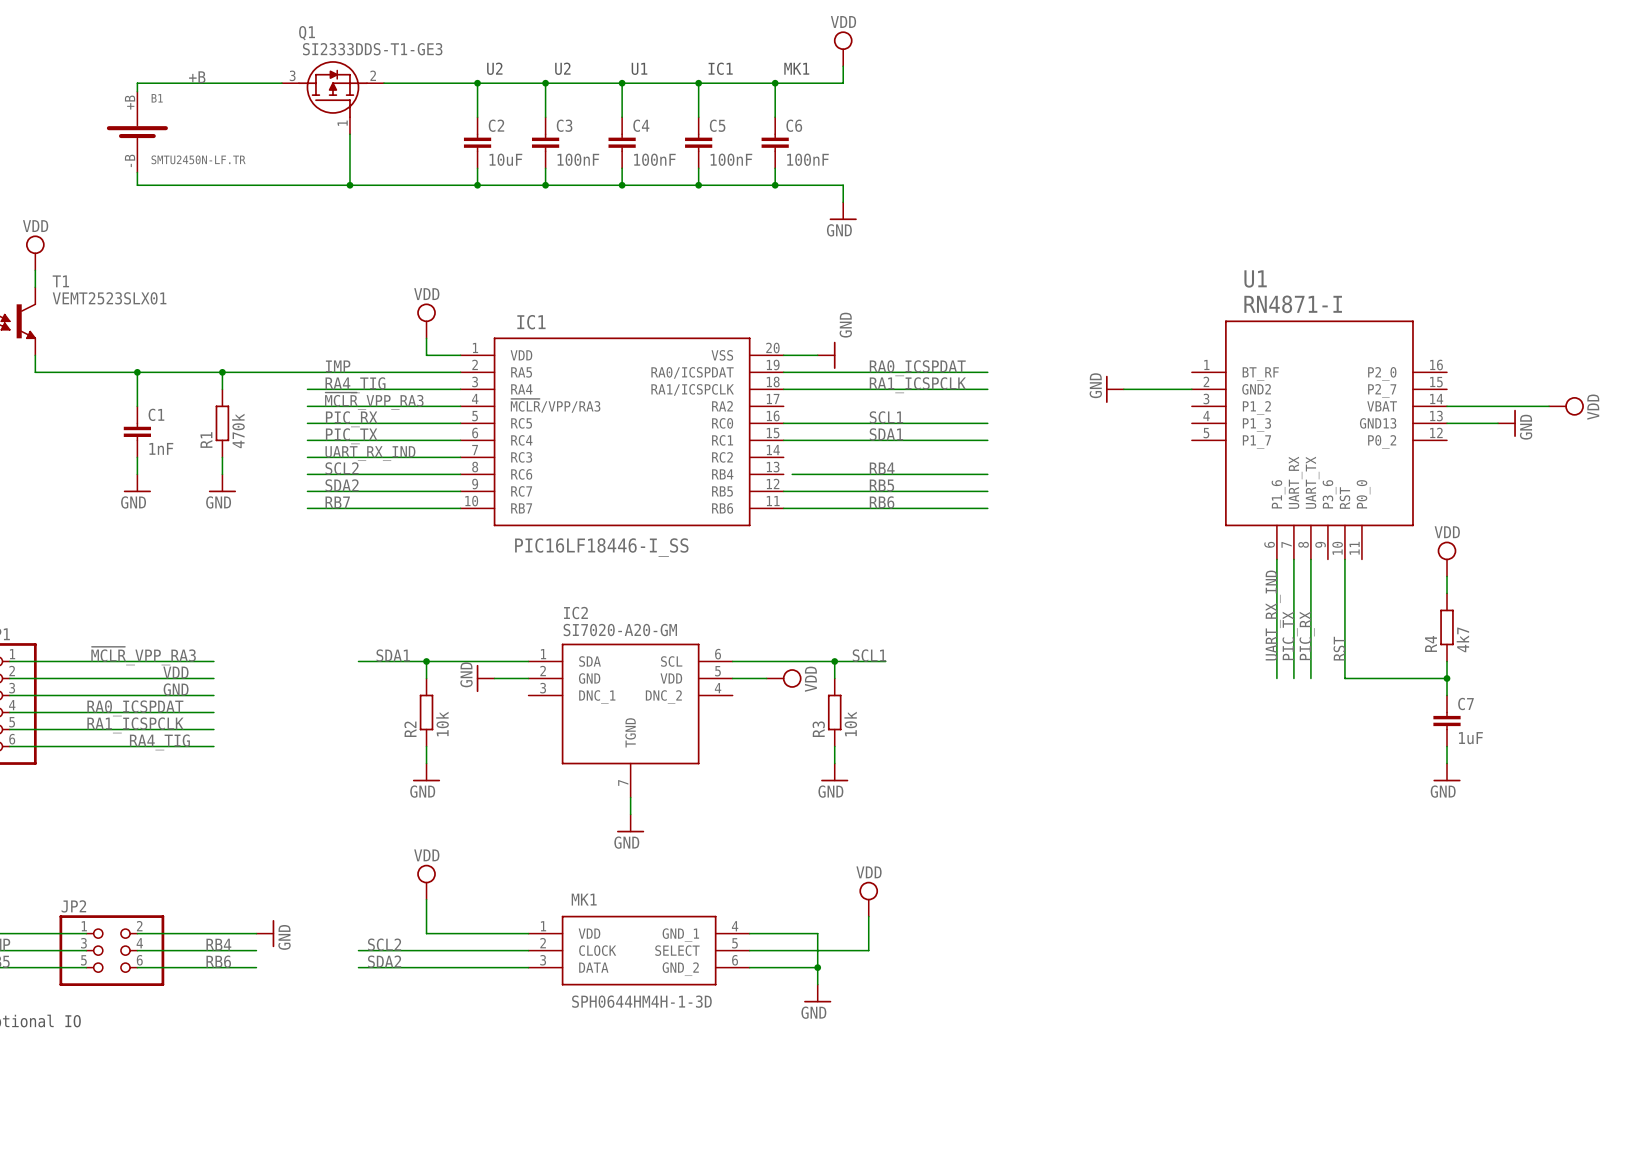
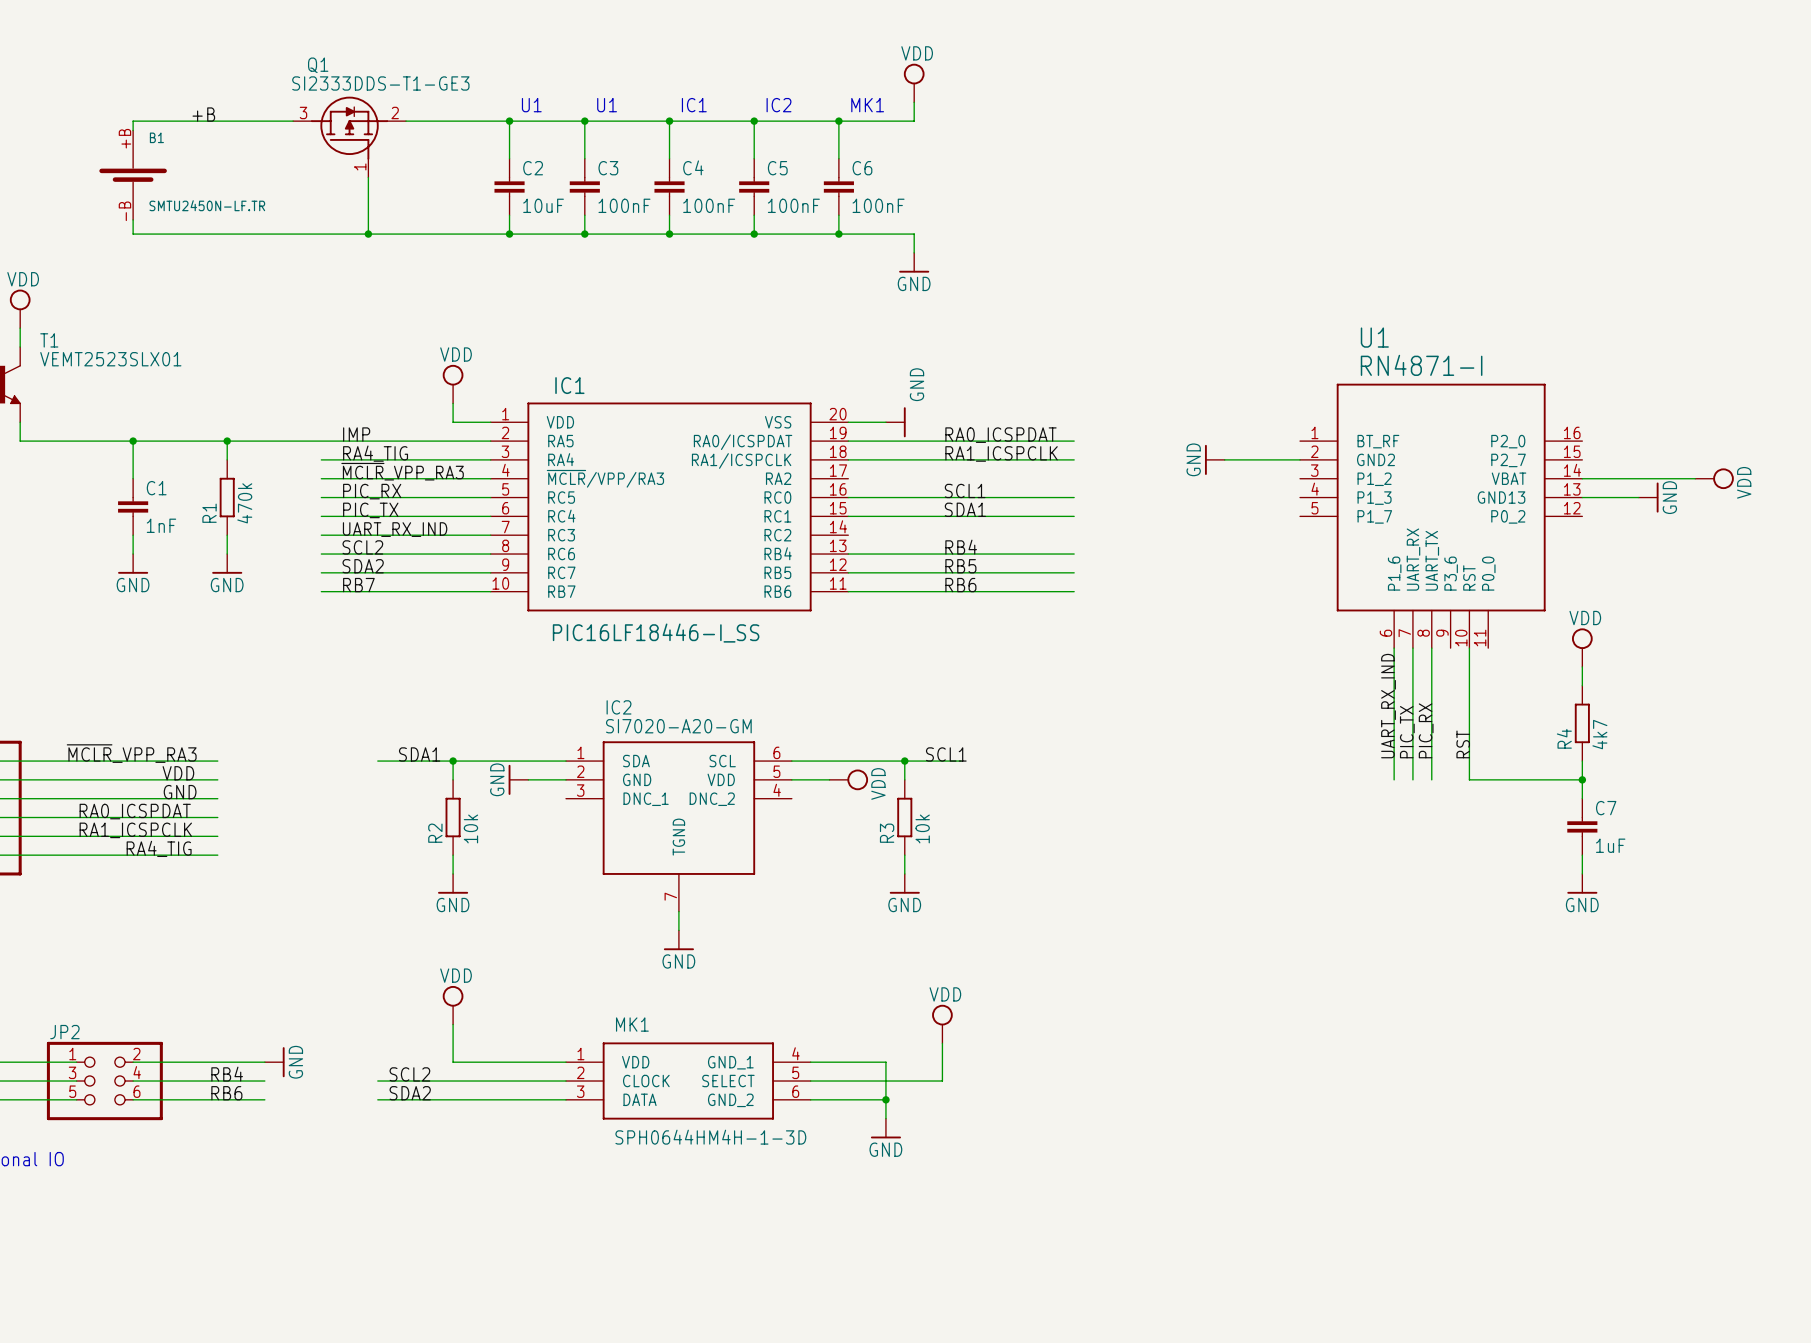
text: U2 (494, 68) -> U1 (531, 105)
text: U2 (562, 68) -> U1 (607, 105)
text: U1 (639, 68) -> IC1 (694, 105)
text: IC1 (720, 68) -> IC2 (778, 105)
wire: none -> (848, 554) (857, 554)

